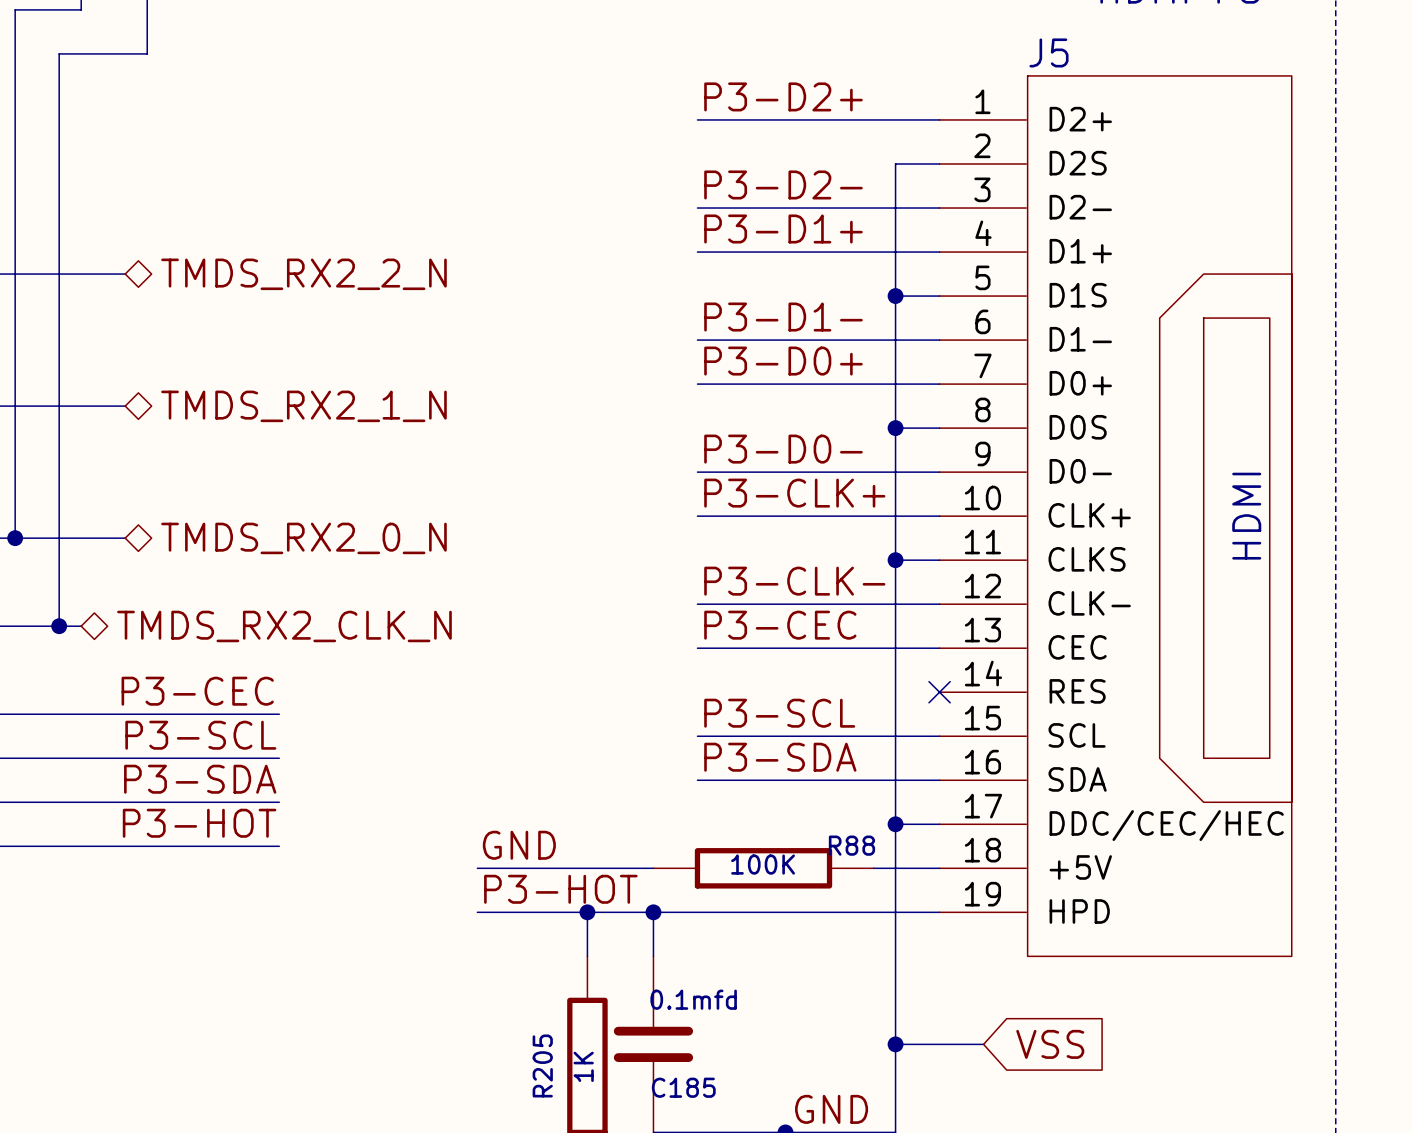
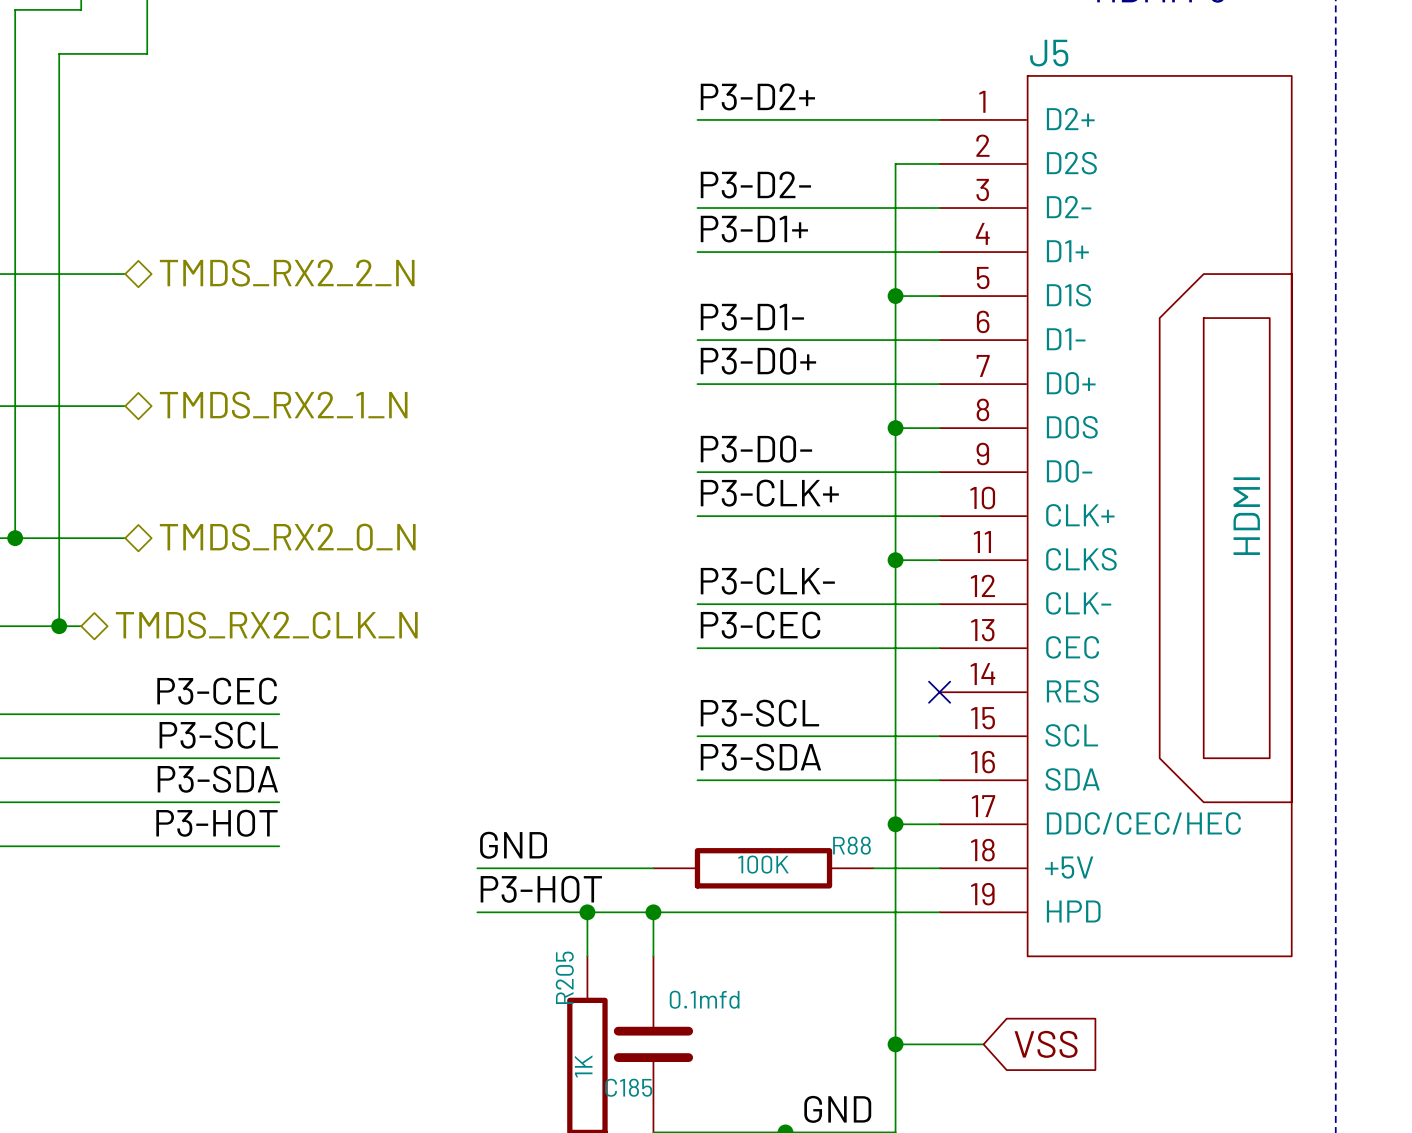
R205 name position: R205 (542, 1065) -> R205 (564, 977)
C185 name position: C185 (683, 1087) -> C185 (628, 1087)

